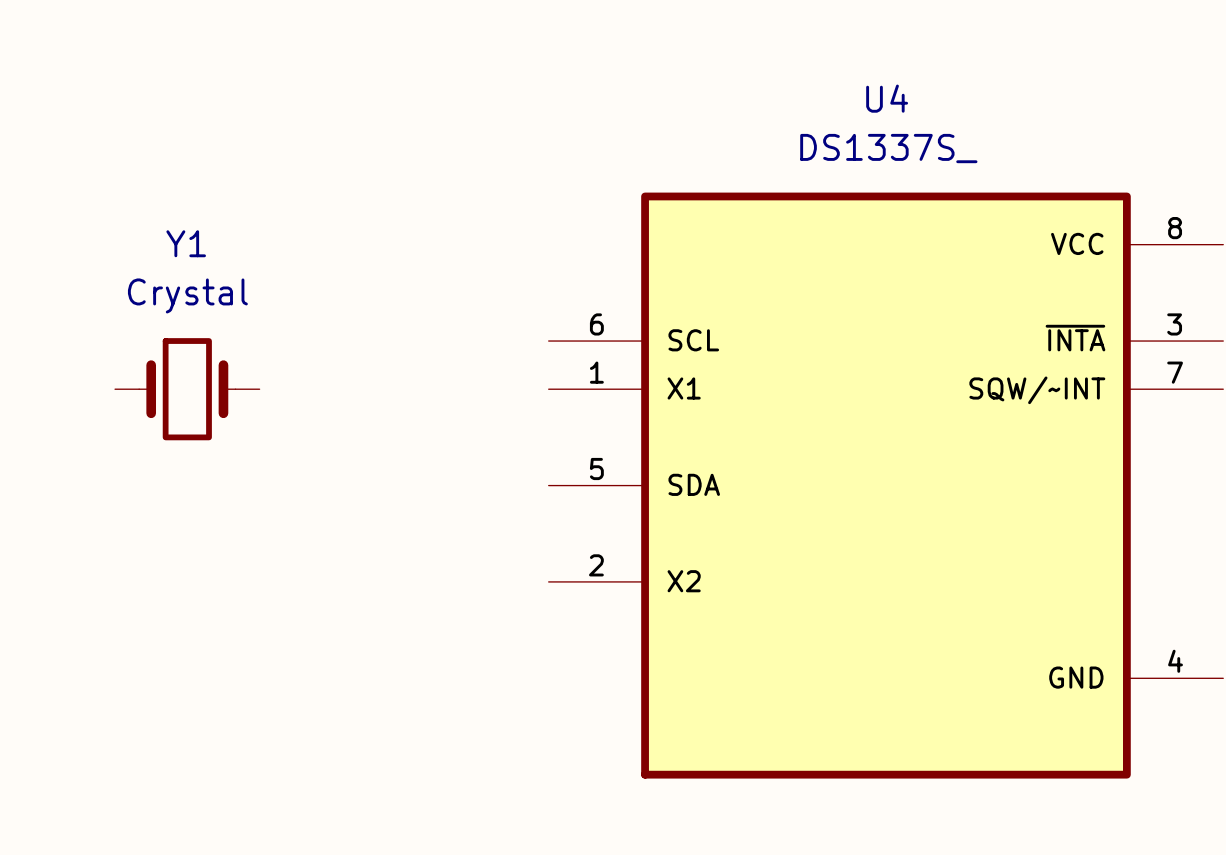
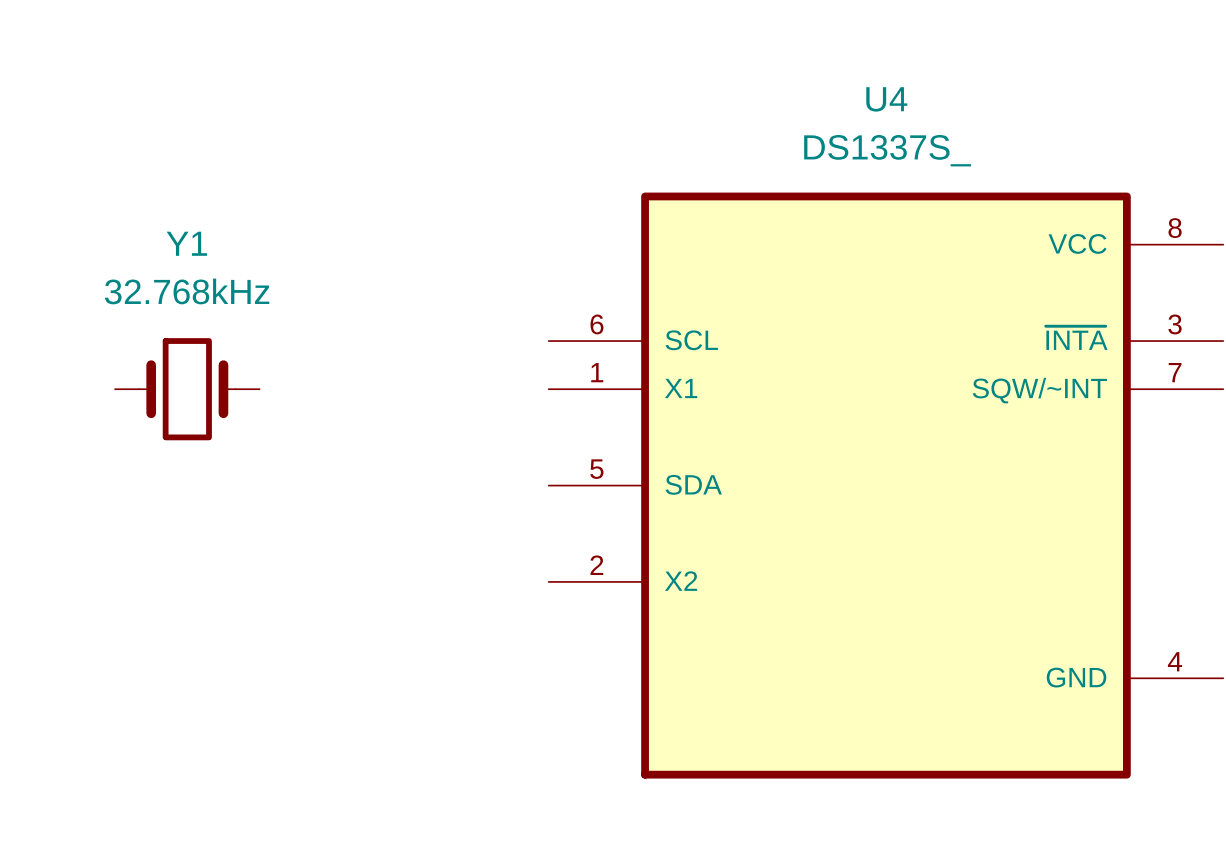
Y1 value: Crystal (187, 295) -> 32.768kHz (187, 291)

